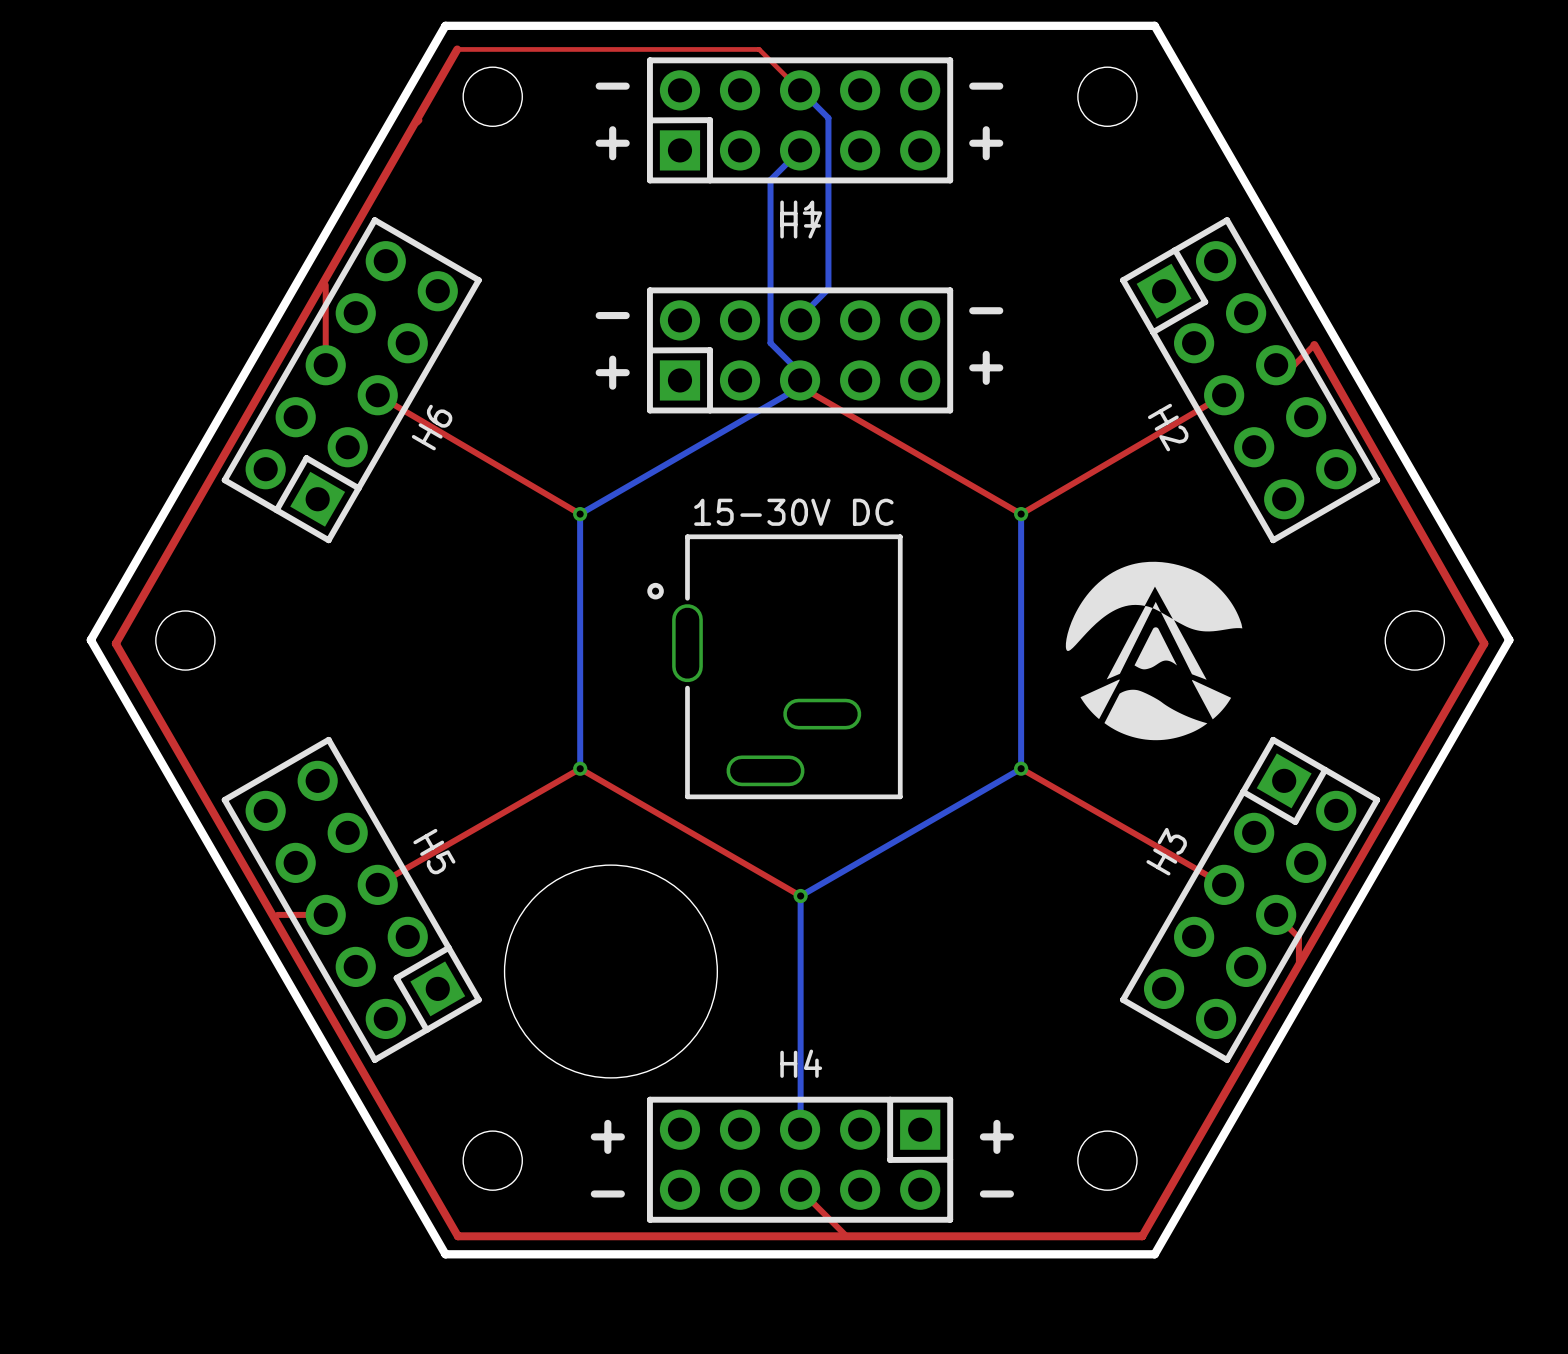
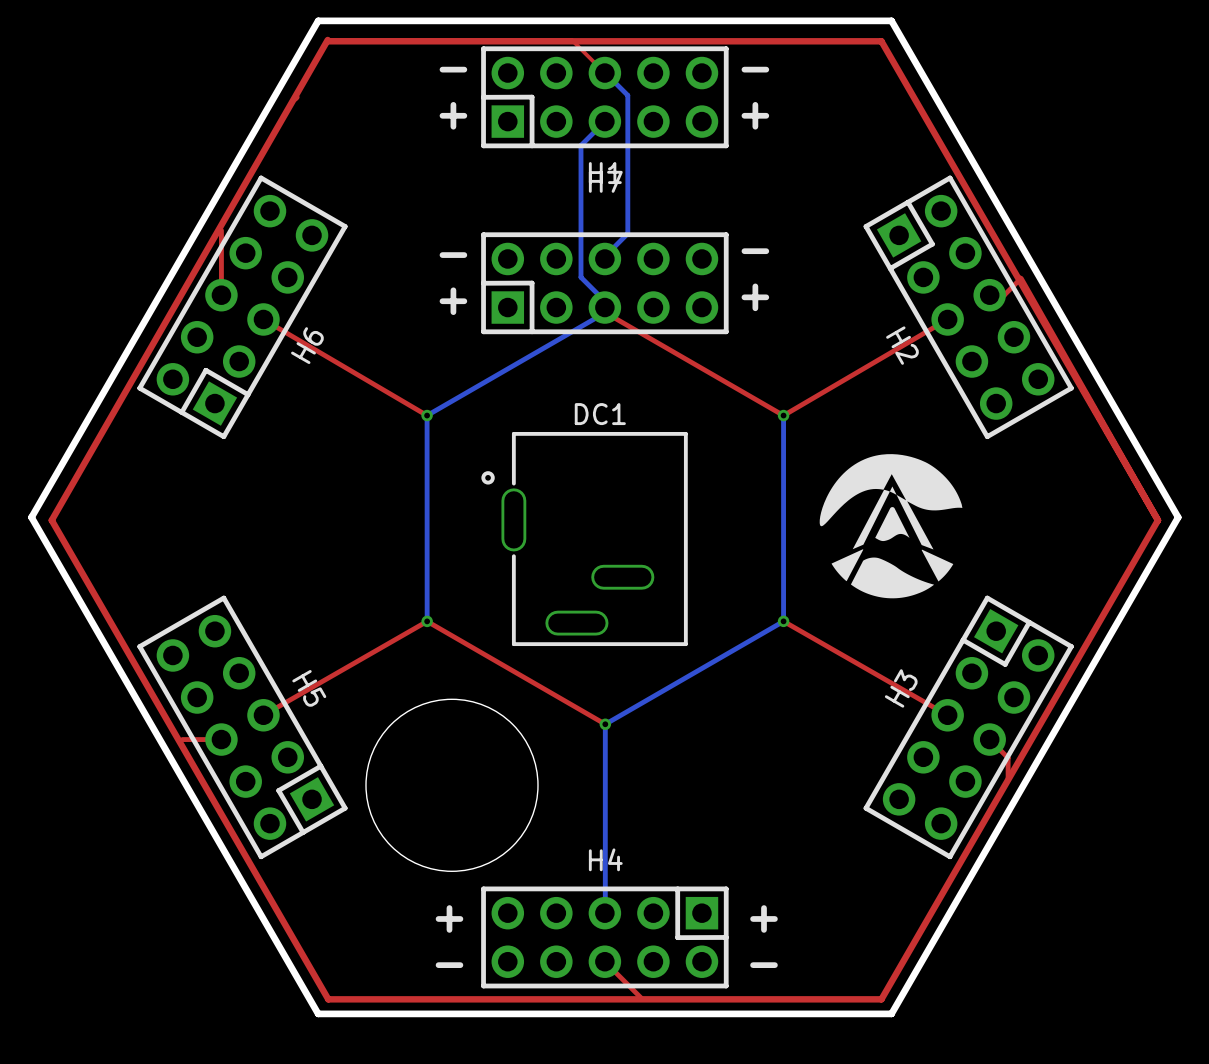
top track: none -> (328, 41) (881, 41) (1158, 520)
round board edge: [462, 66, 523, 127] -> none
round board edge: [1077, 66, 1138, 127] -> none
15-30V DC name: 15-30V DC (793, 512) -> DC1 (600, 414)
round board edge: [155, 610, 216, 671] -> none
round board edge: [1384, 610, 1445, 671] -> none
round board edge: [462, 1130, 523, 1191] -> none
round board edge: [1077, 1130, 1138, 1191] -> none

